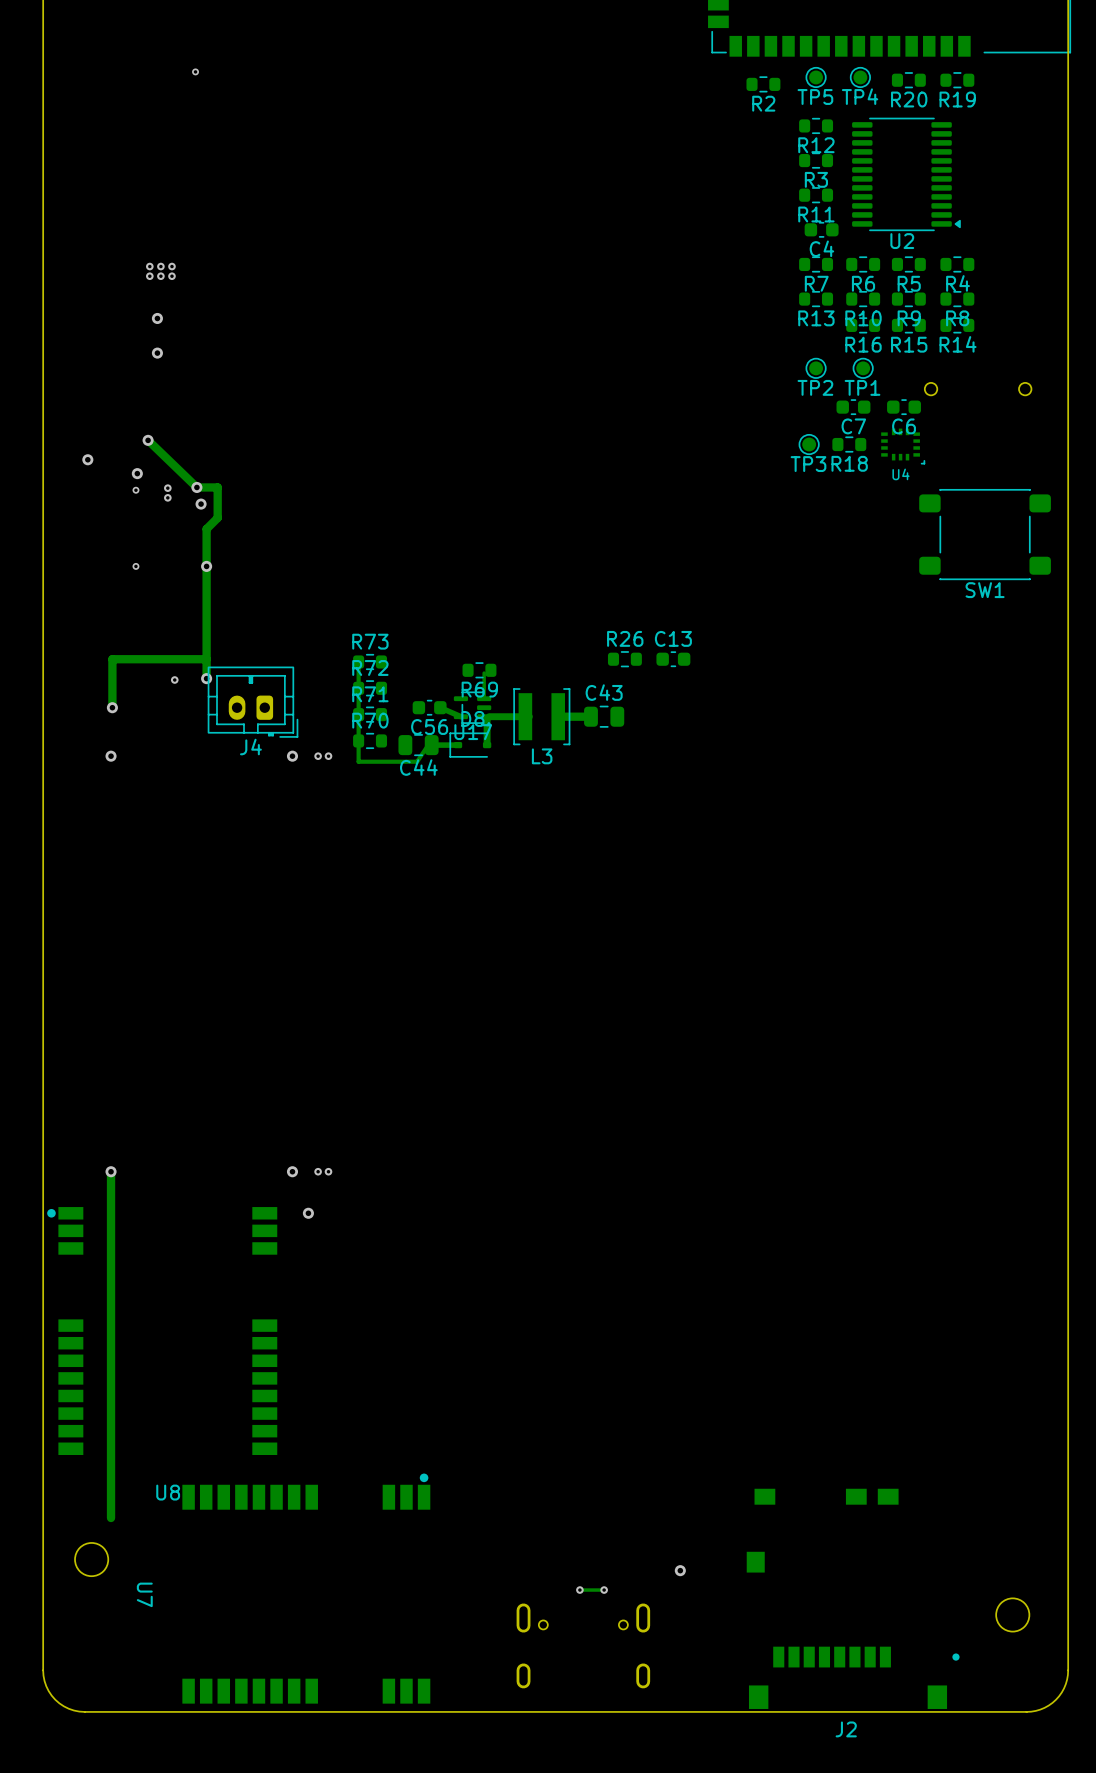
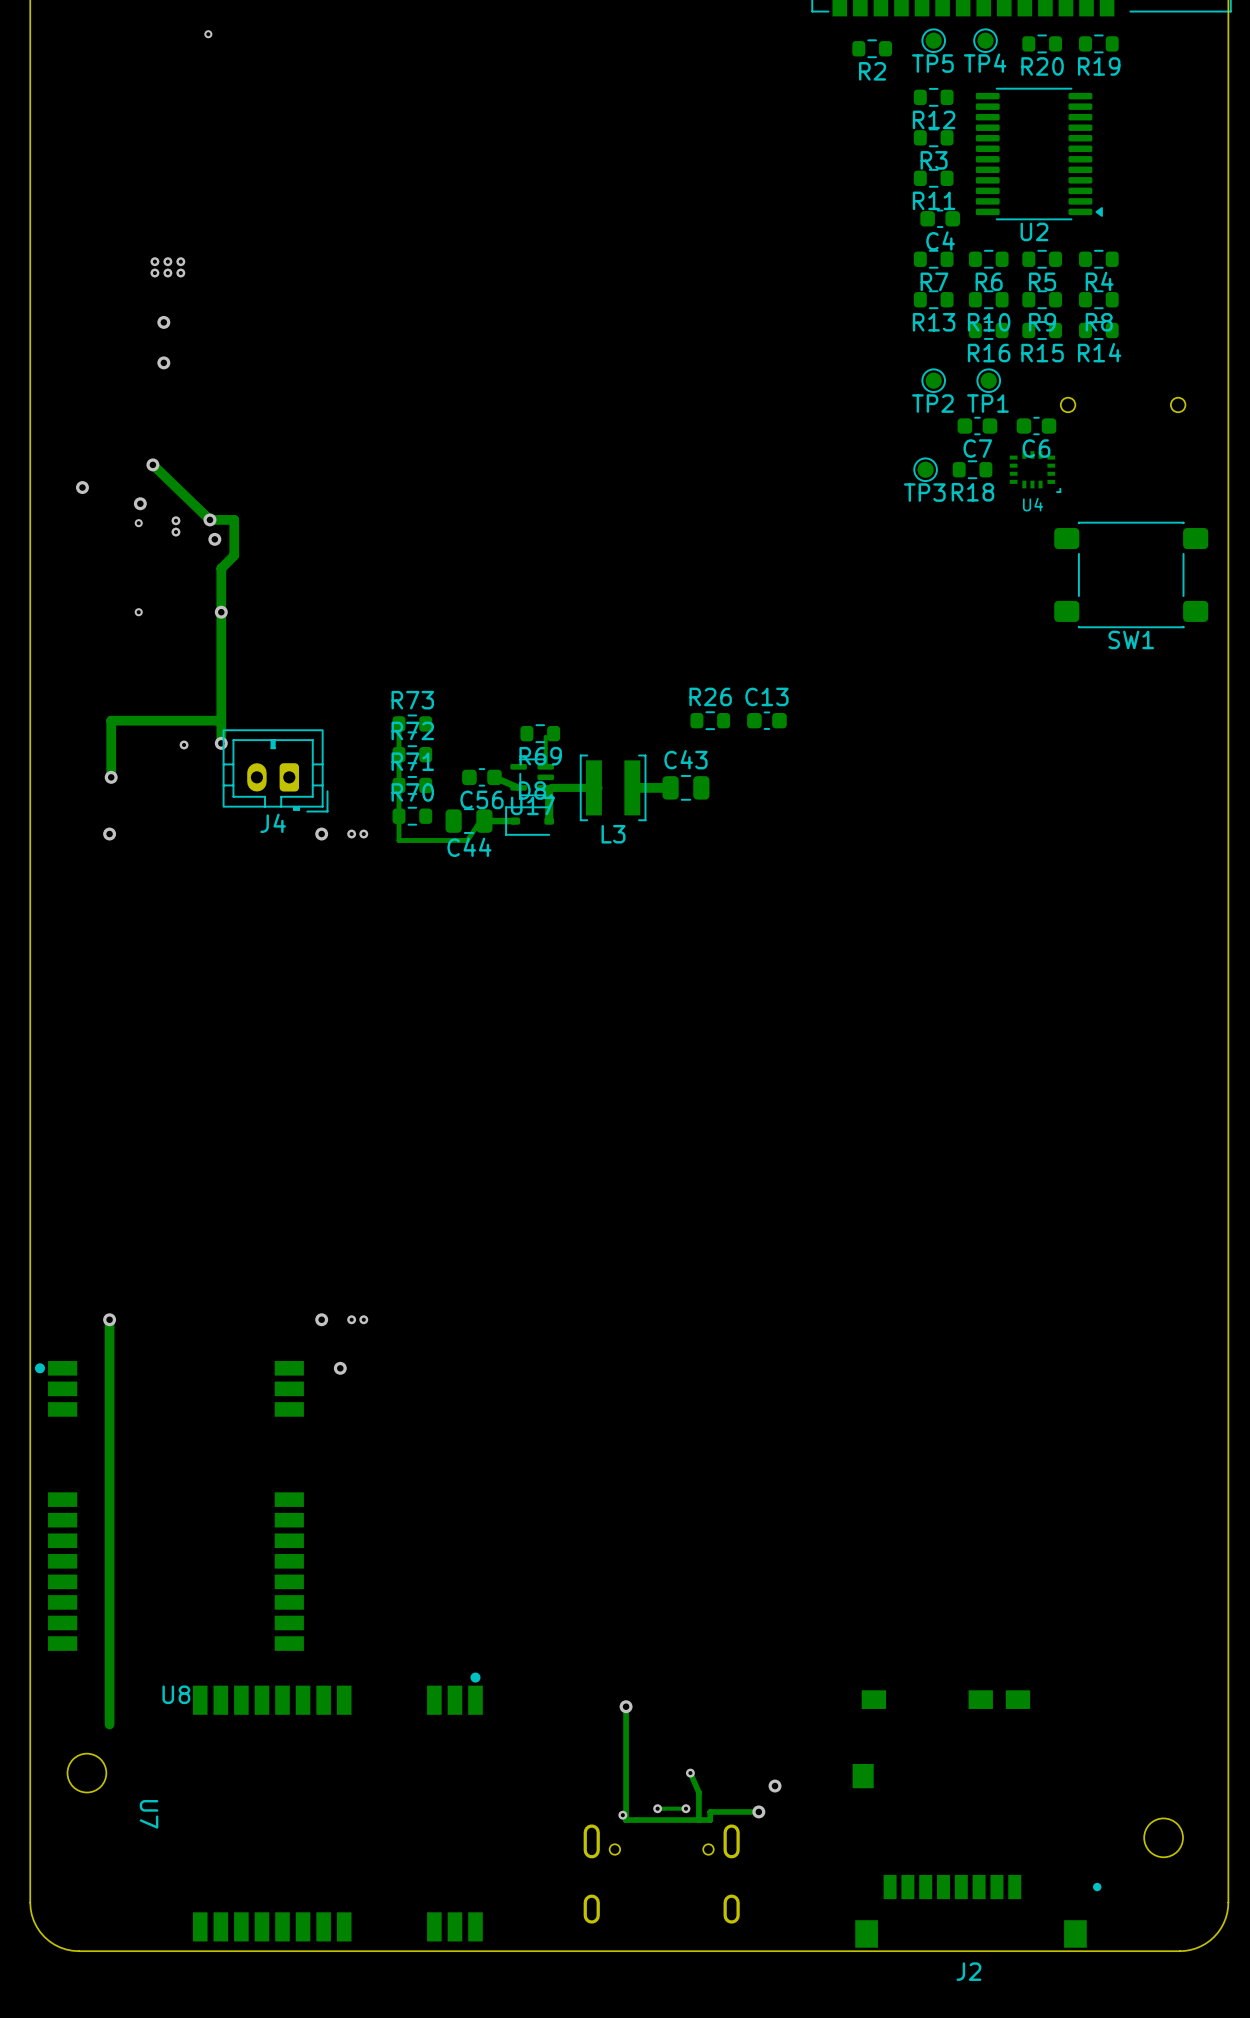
track: none -> (626, 1706) (626, 1820)
via: none -> (626, 1706)
track: none -> (690, 1773) (698, 1792) (698, 1820)
via: none -> (690, 1773)
track: none -> (758, 1811) (710, 1811) (710, 1820) (626, 1820)
via: none -> (758, 1811)
via: none -> (622, 1815)

